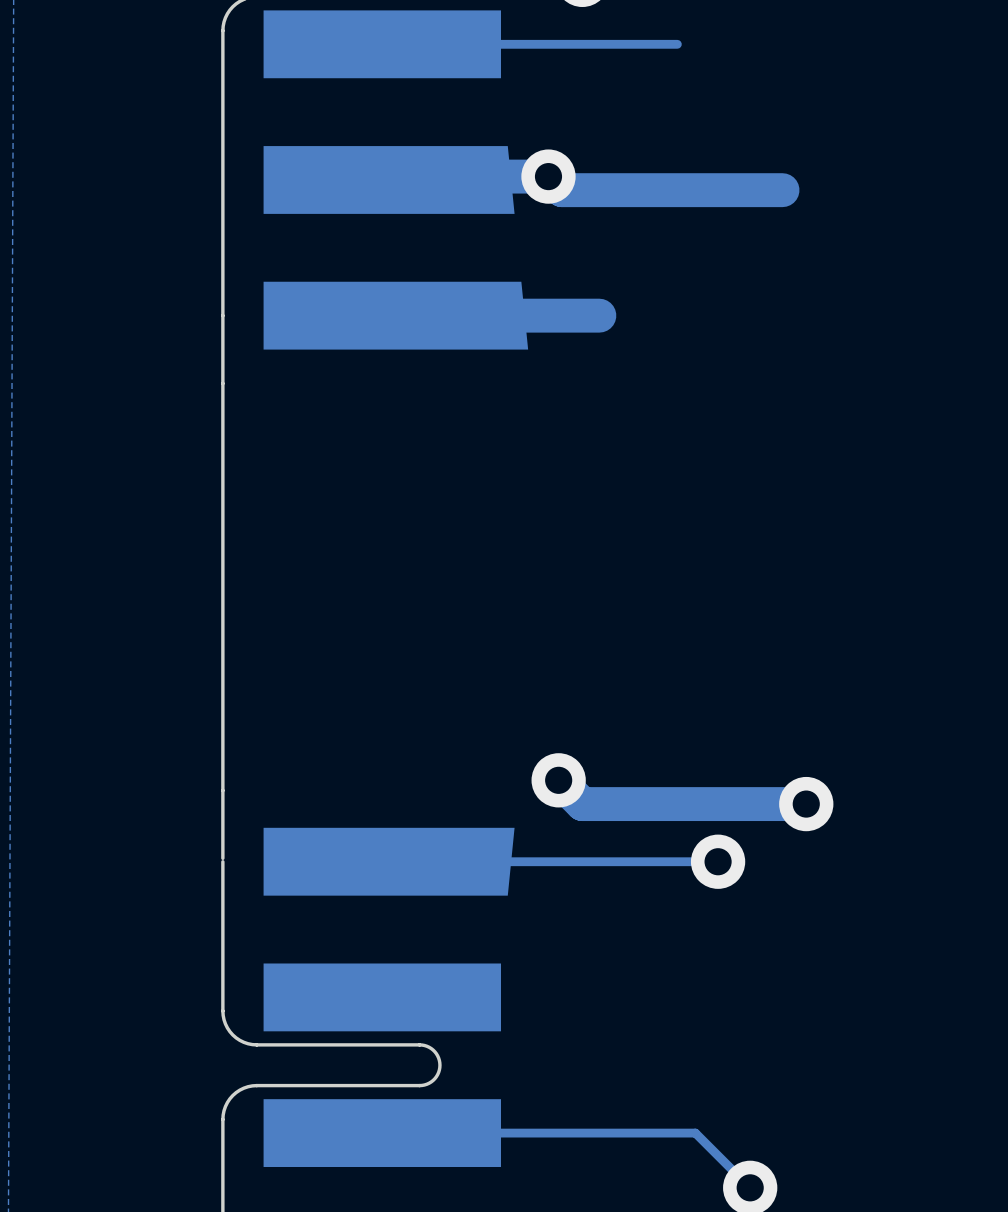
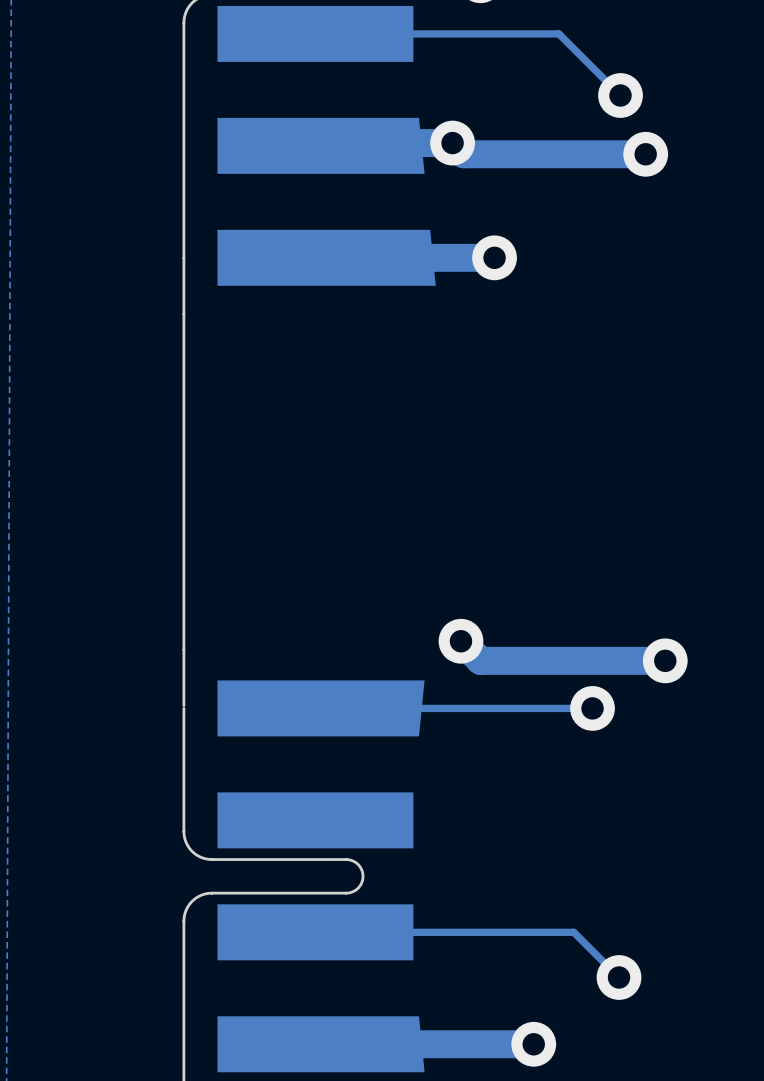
track: none -> (558, 33) (620, 95)
via: none -> (620, 95)
via: none -> (645, 154)
via: none -> (494, 257)

